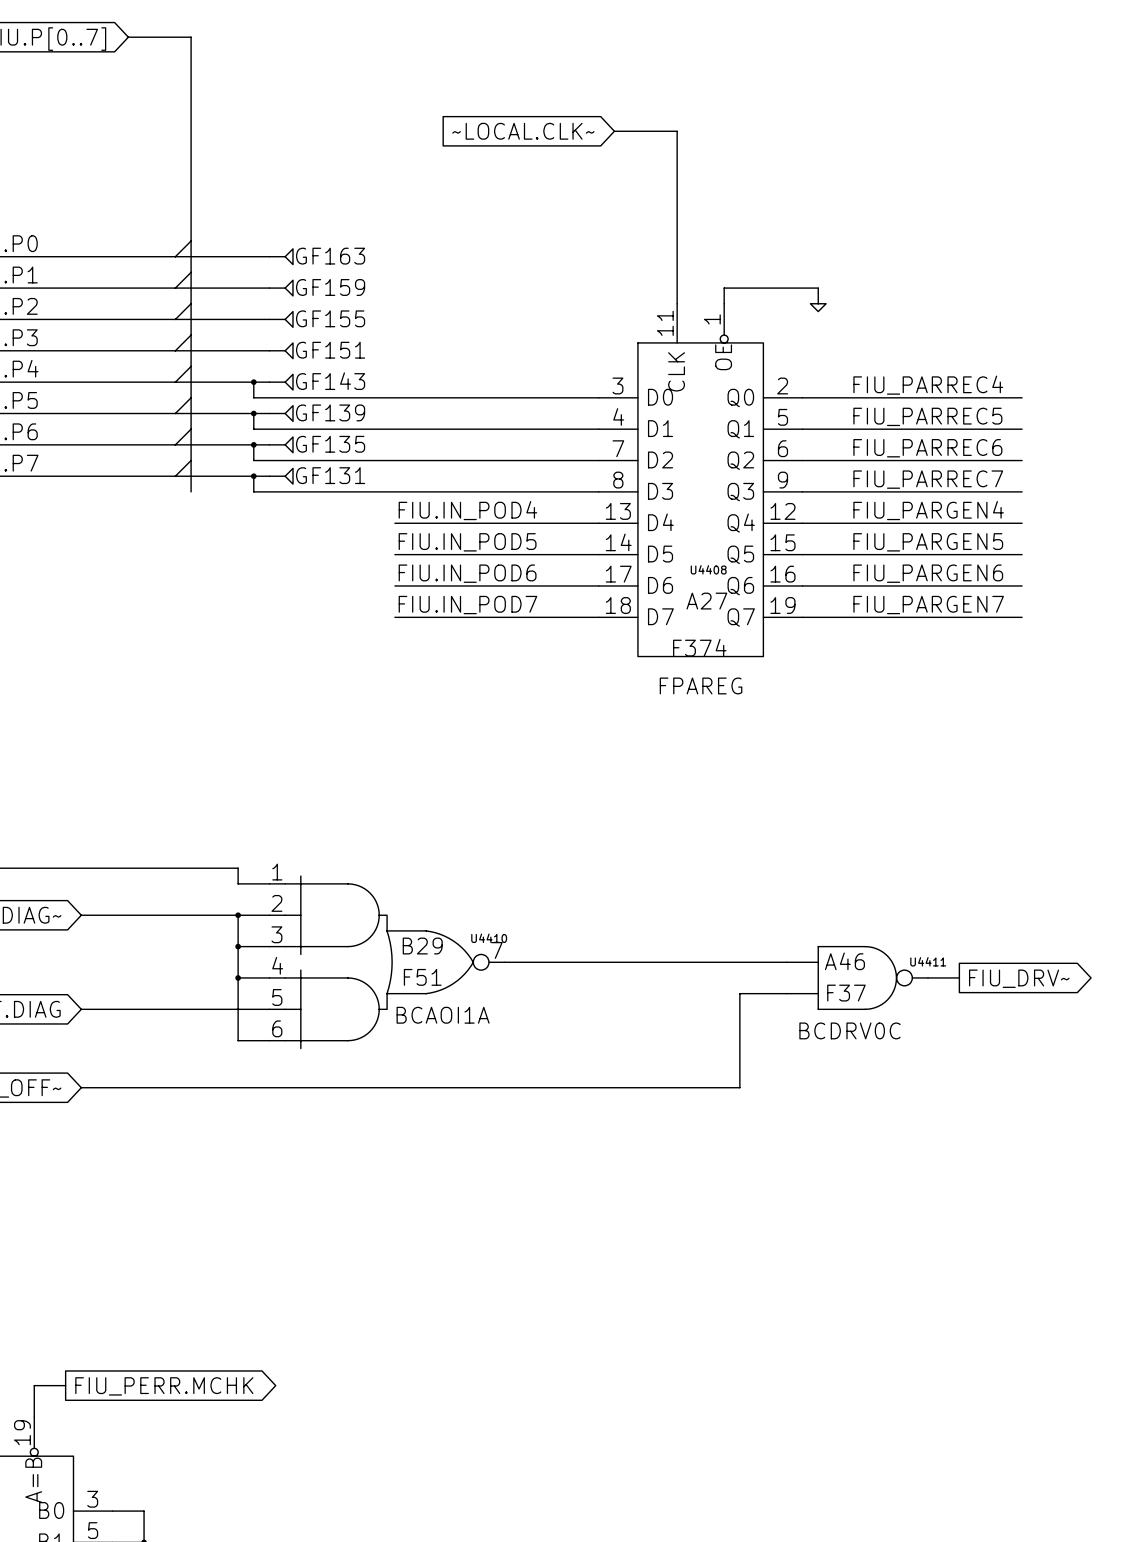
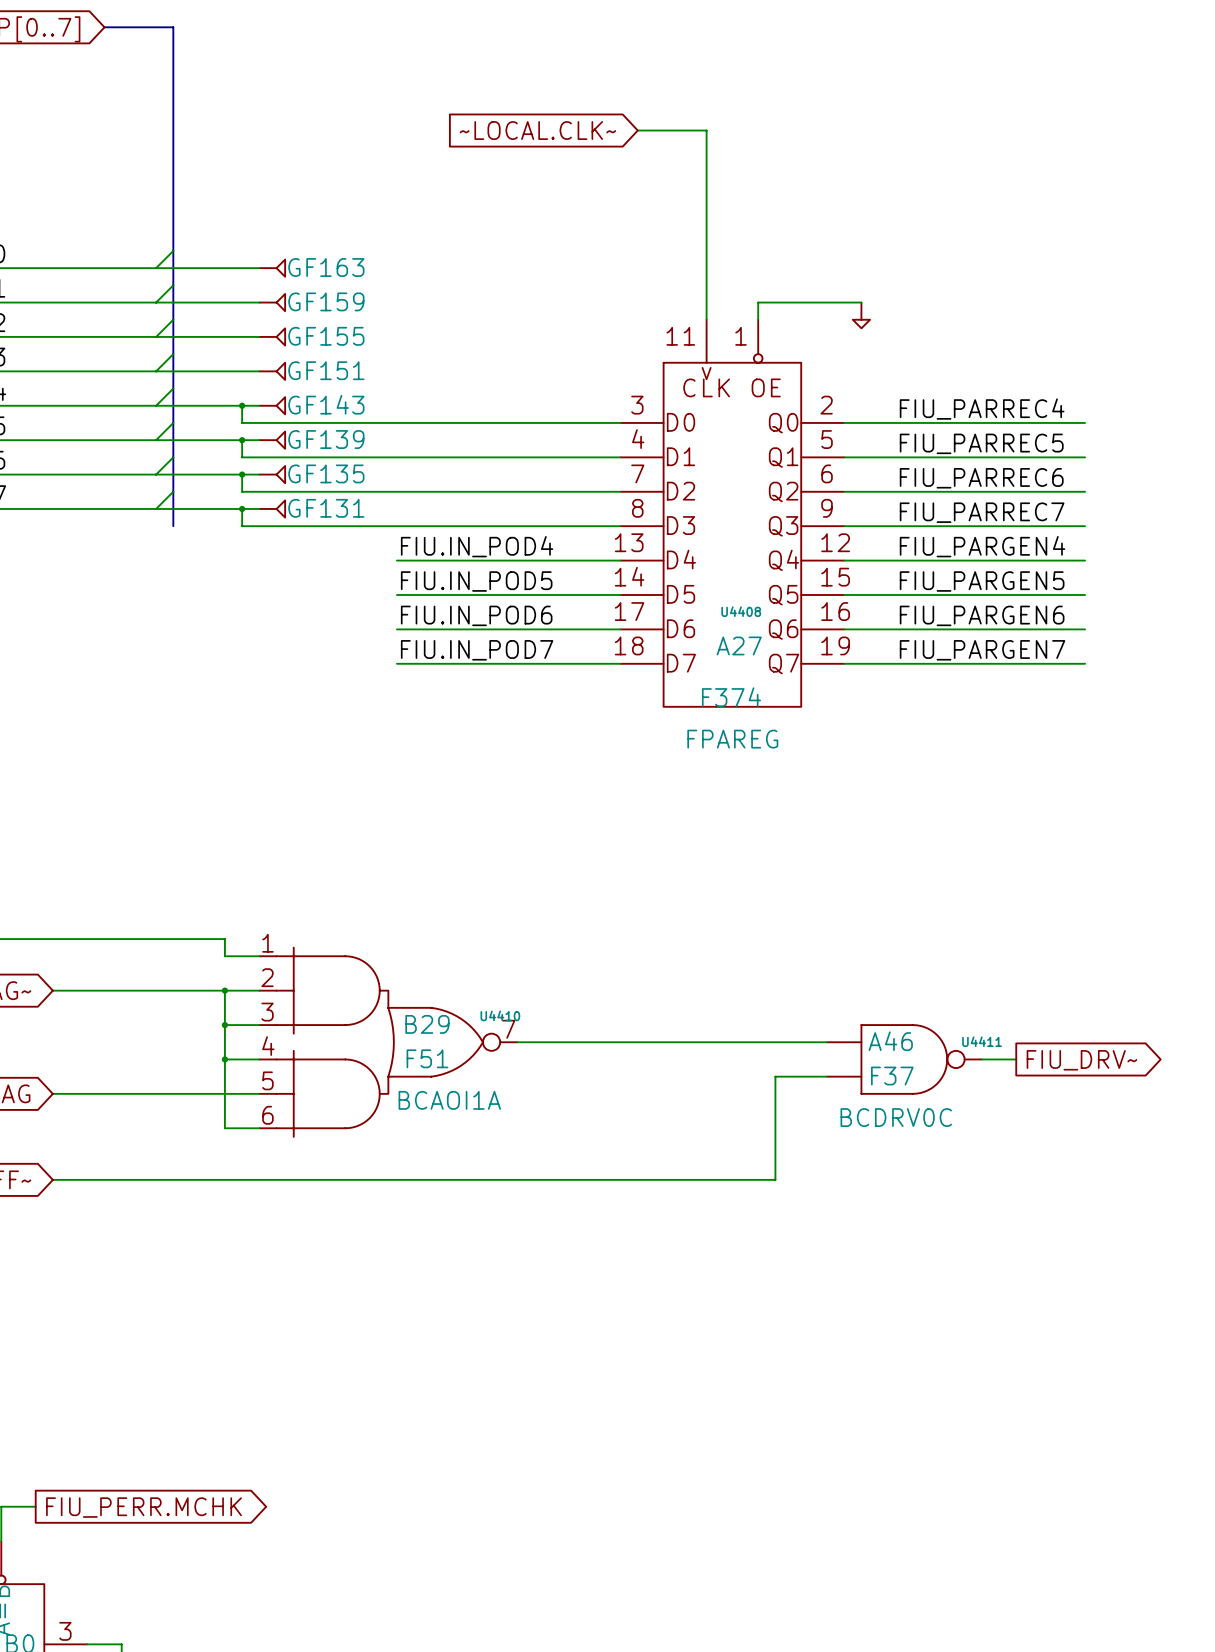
U4408 symbol: [598, 303, 803, 657] -> [620, 319, 845, 707]

